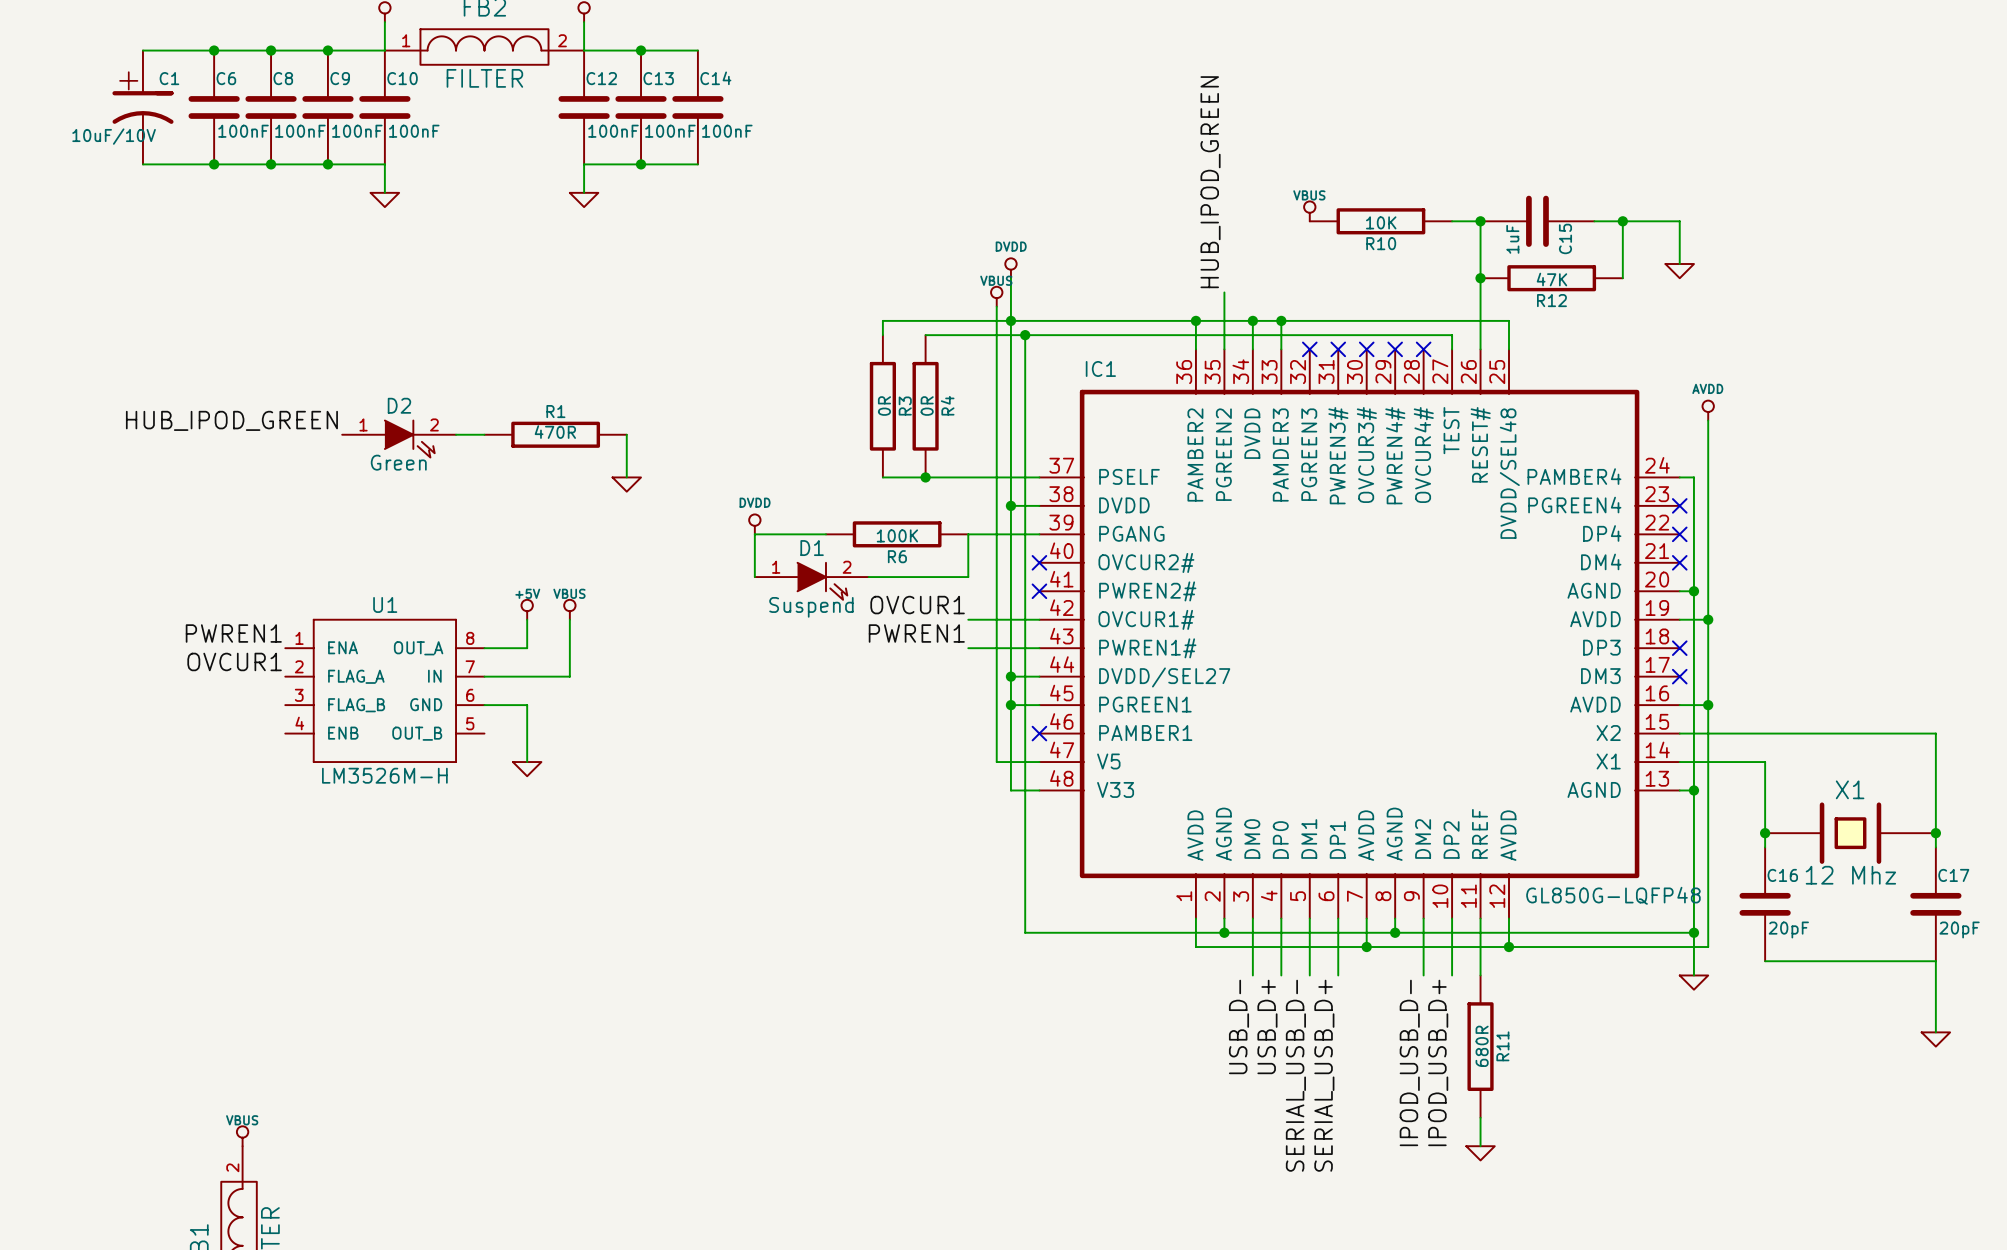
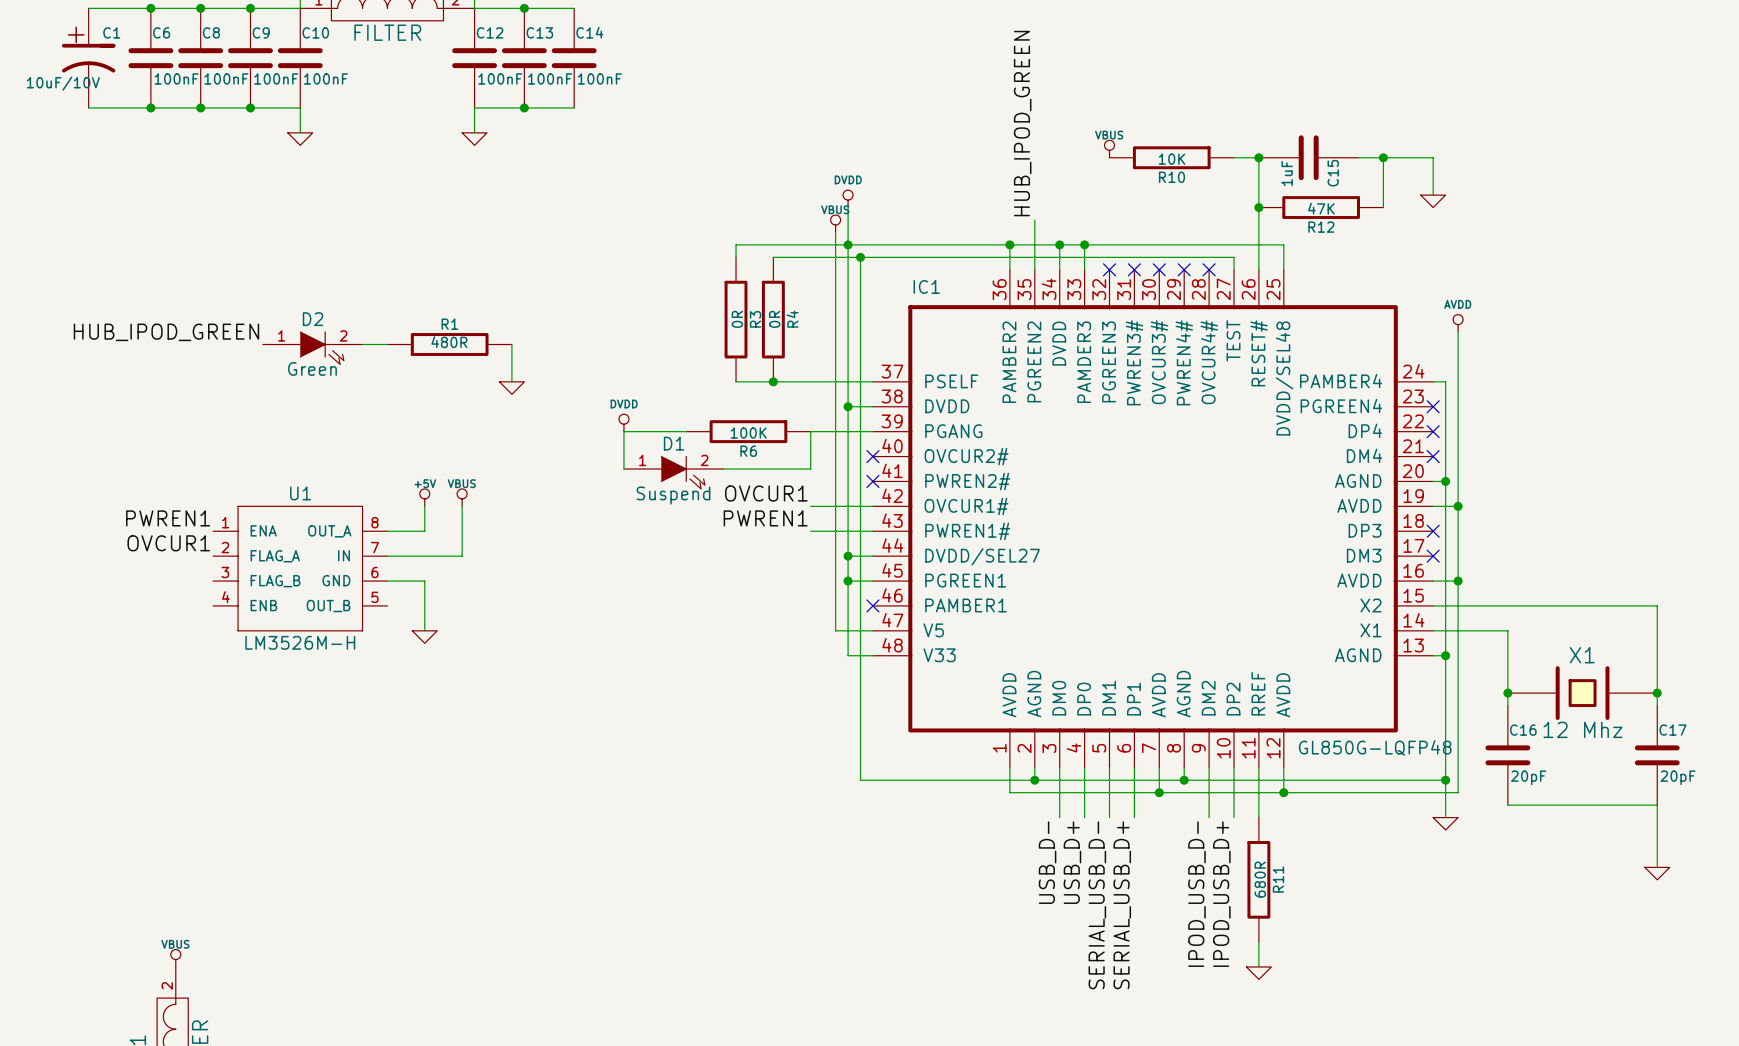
R1 value: 470R (555, 432) -> 480R (449, 342)

